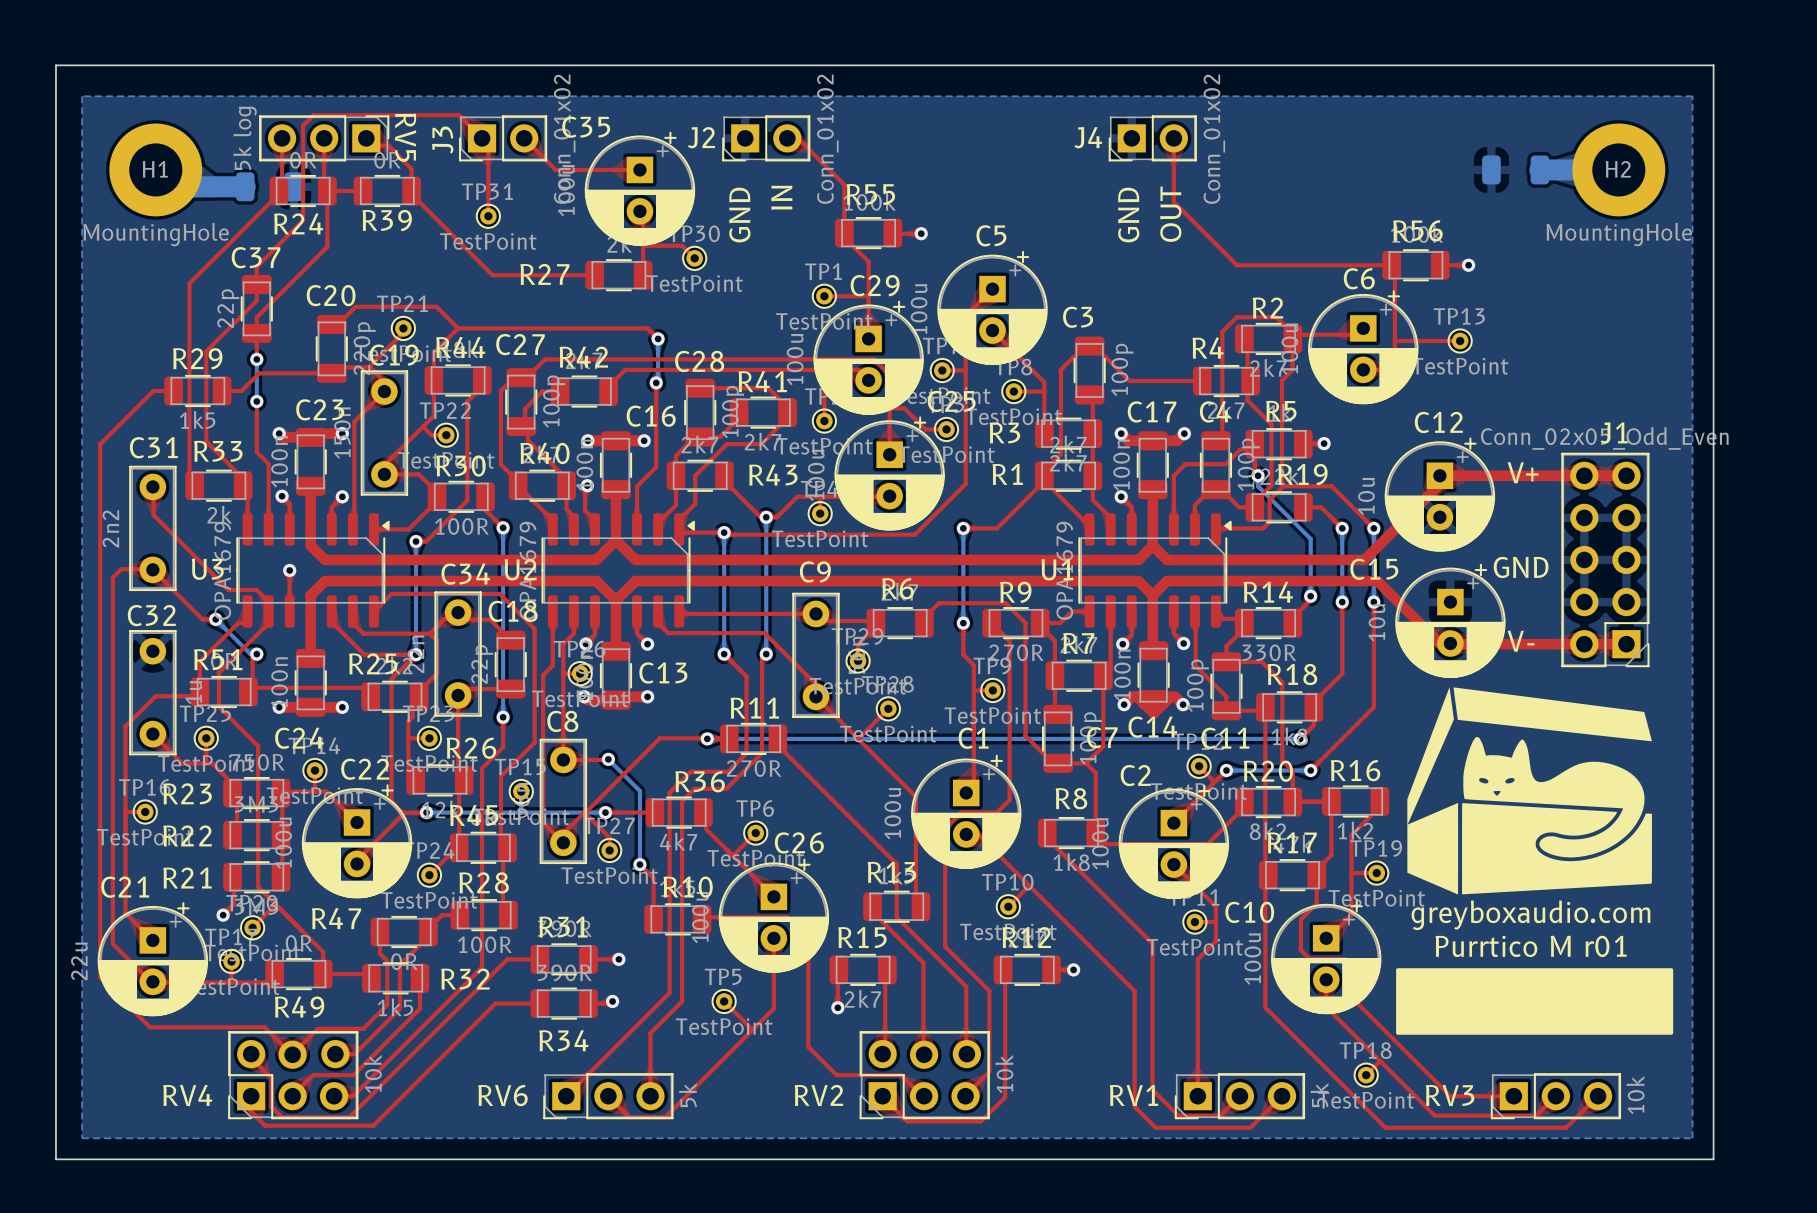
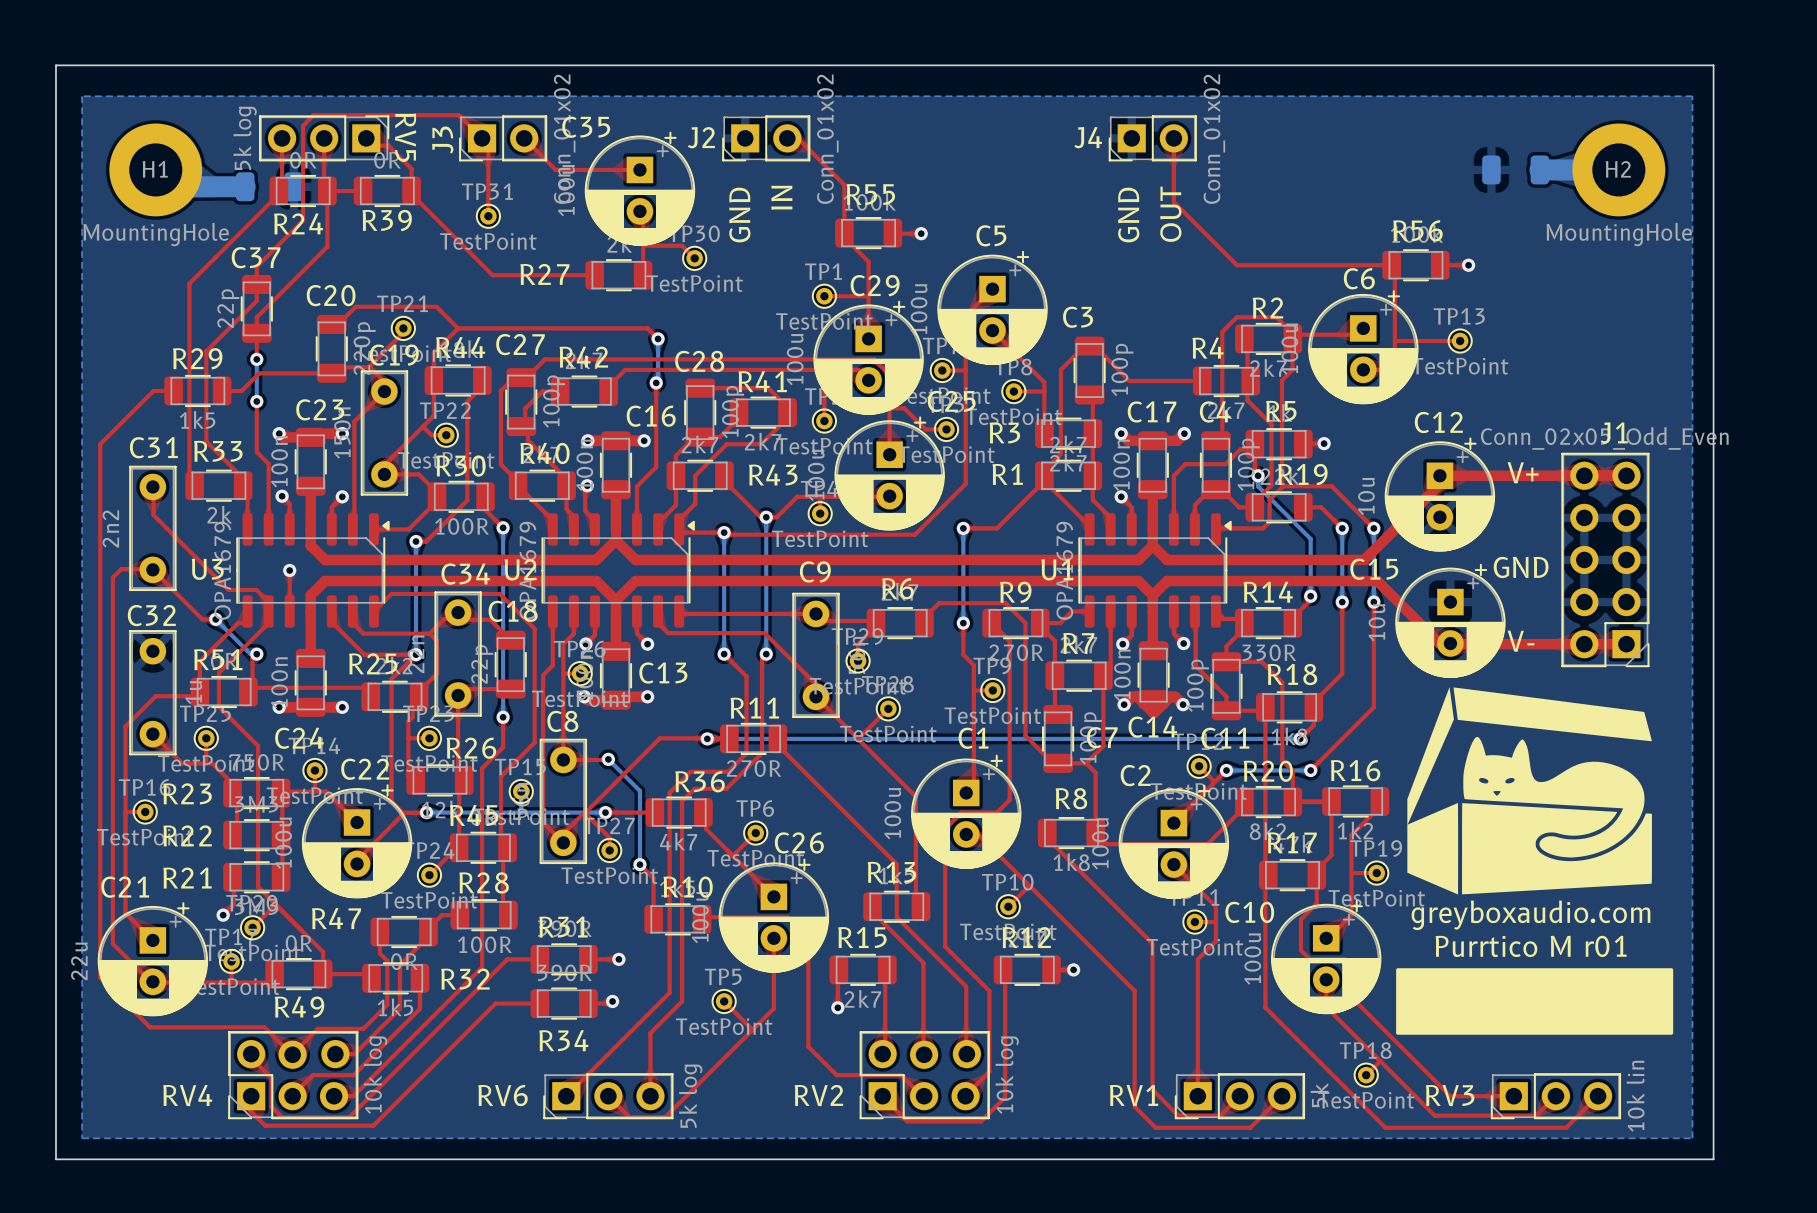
RV4 value: 10k (372, 1074) -> 10k log (375, 1075)
RV2 value: 10k (1004, 1074) -> 10k log (1007, 1075)
RV6 value: 5k (687, 1095) -> 5k log (690, 1096)
RV3 value: 10k (1635, 1095) -> 10k lin (1635, 1096)

